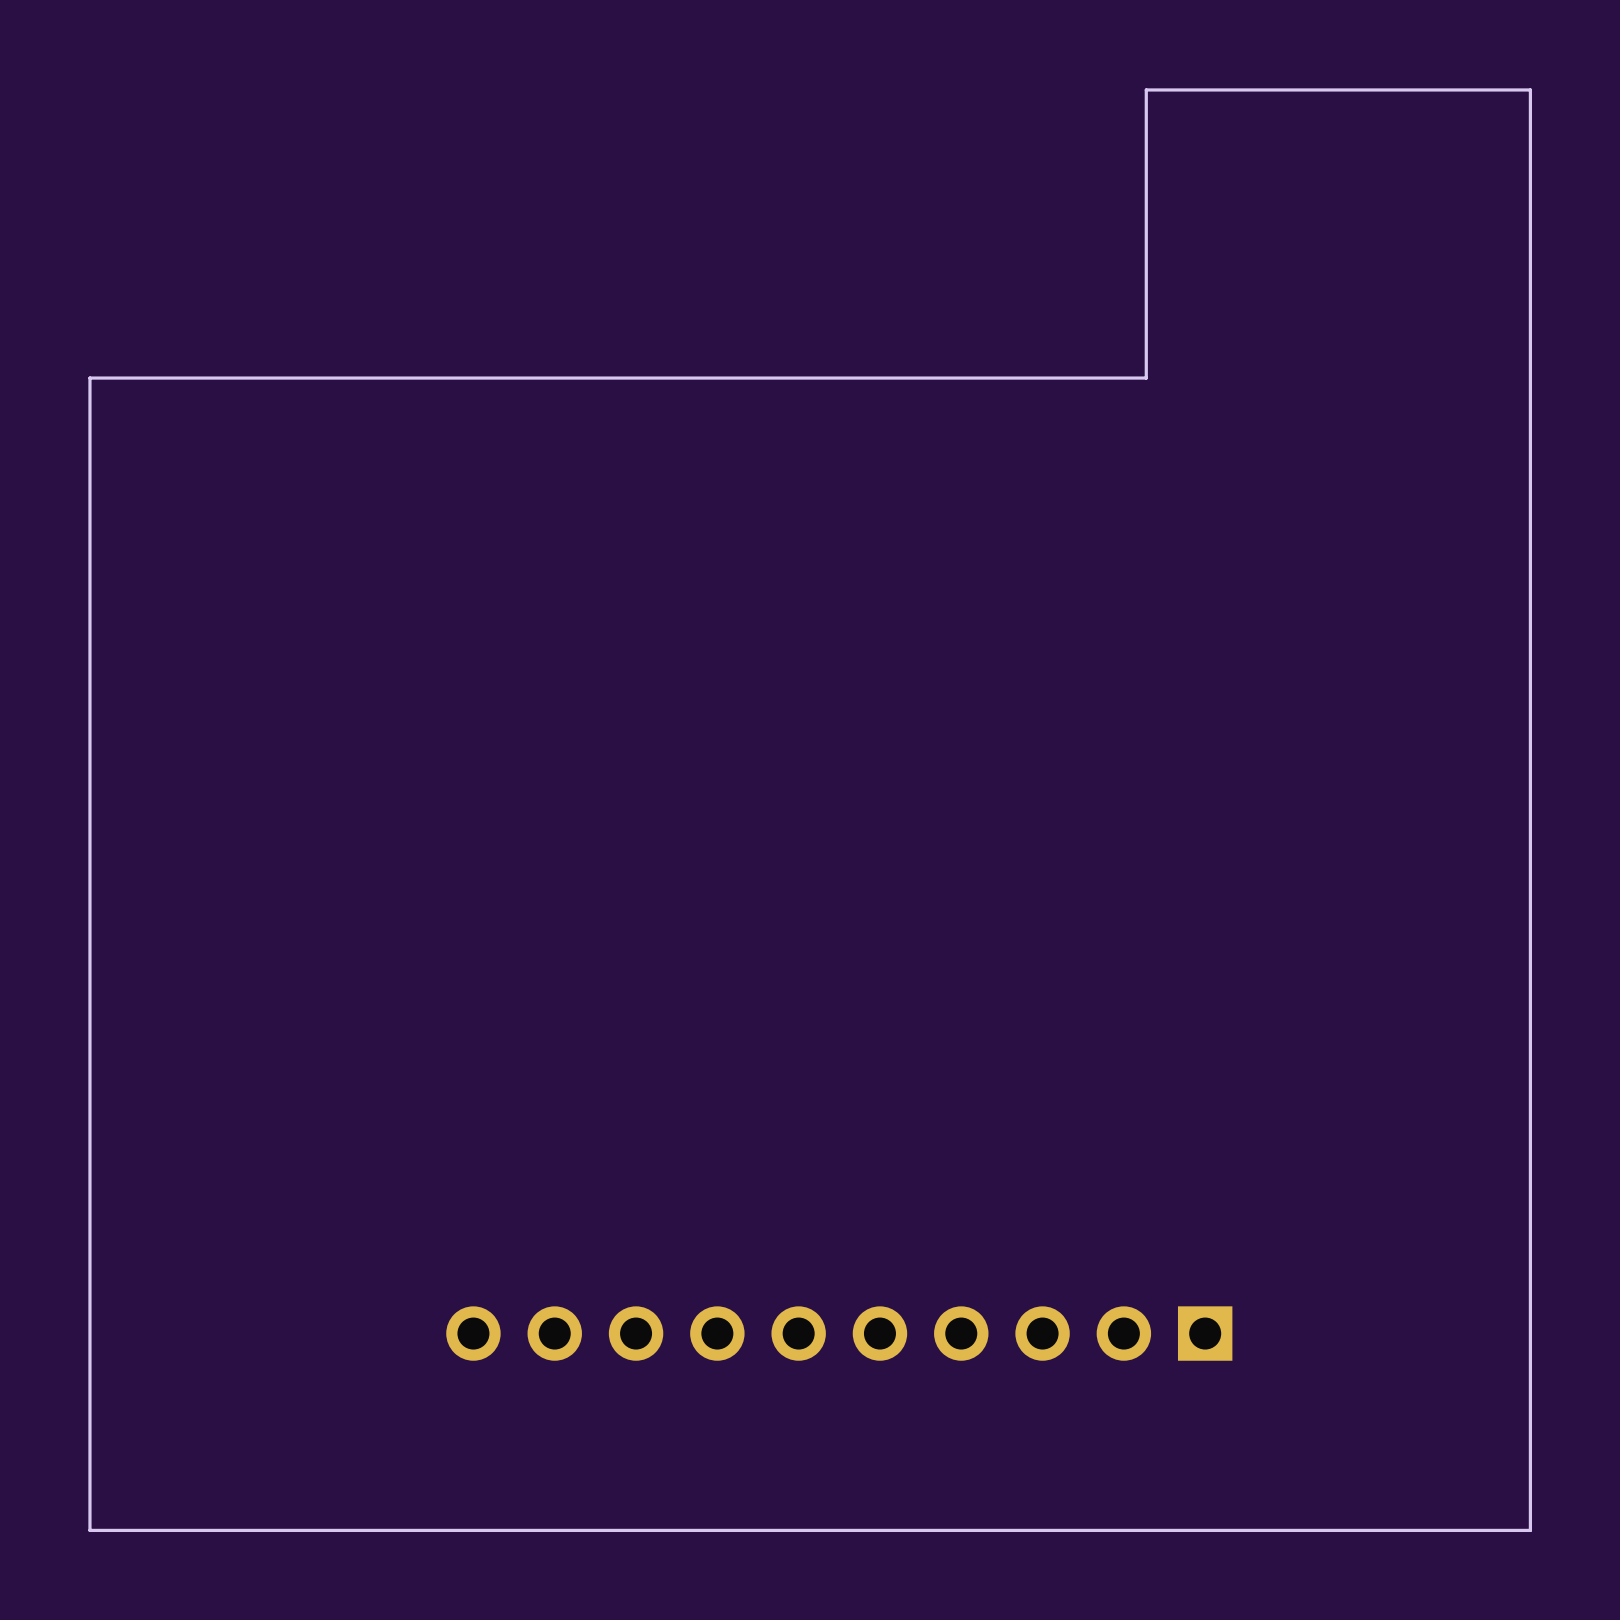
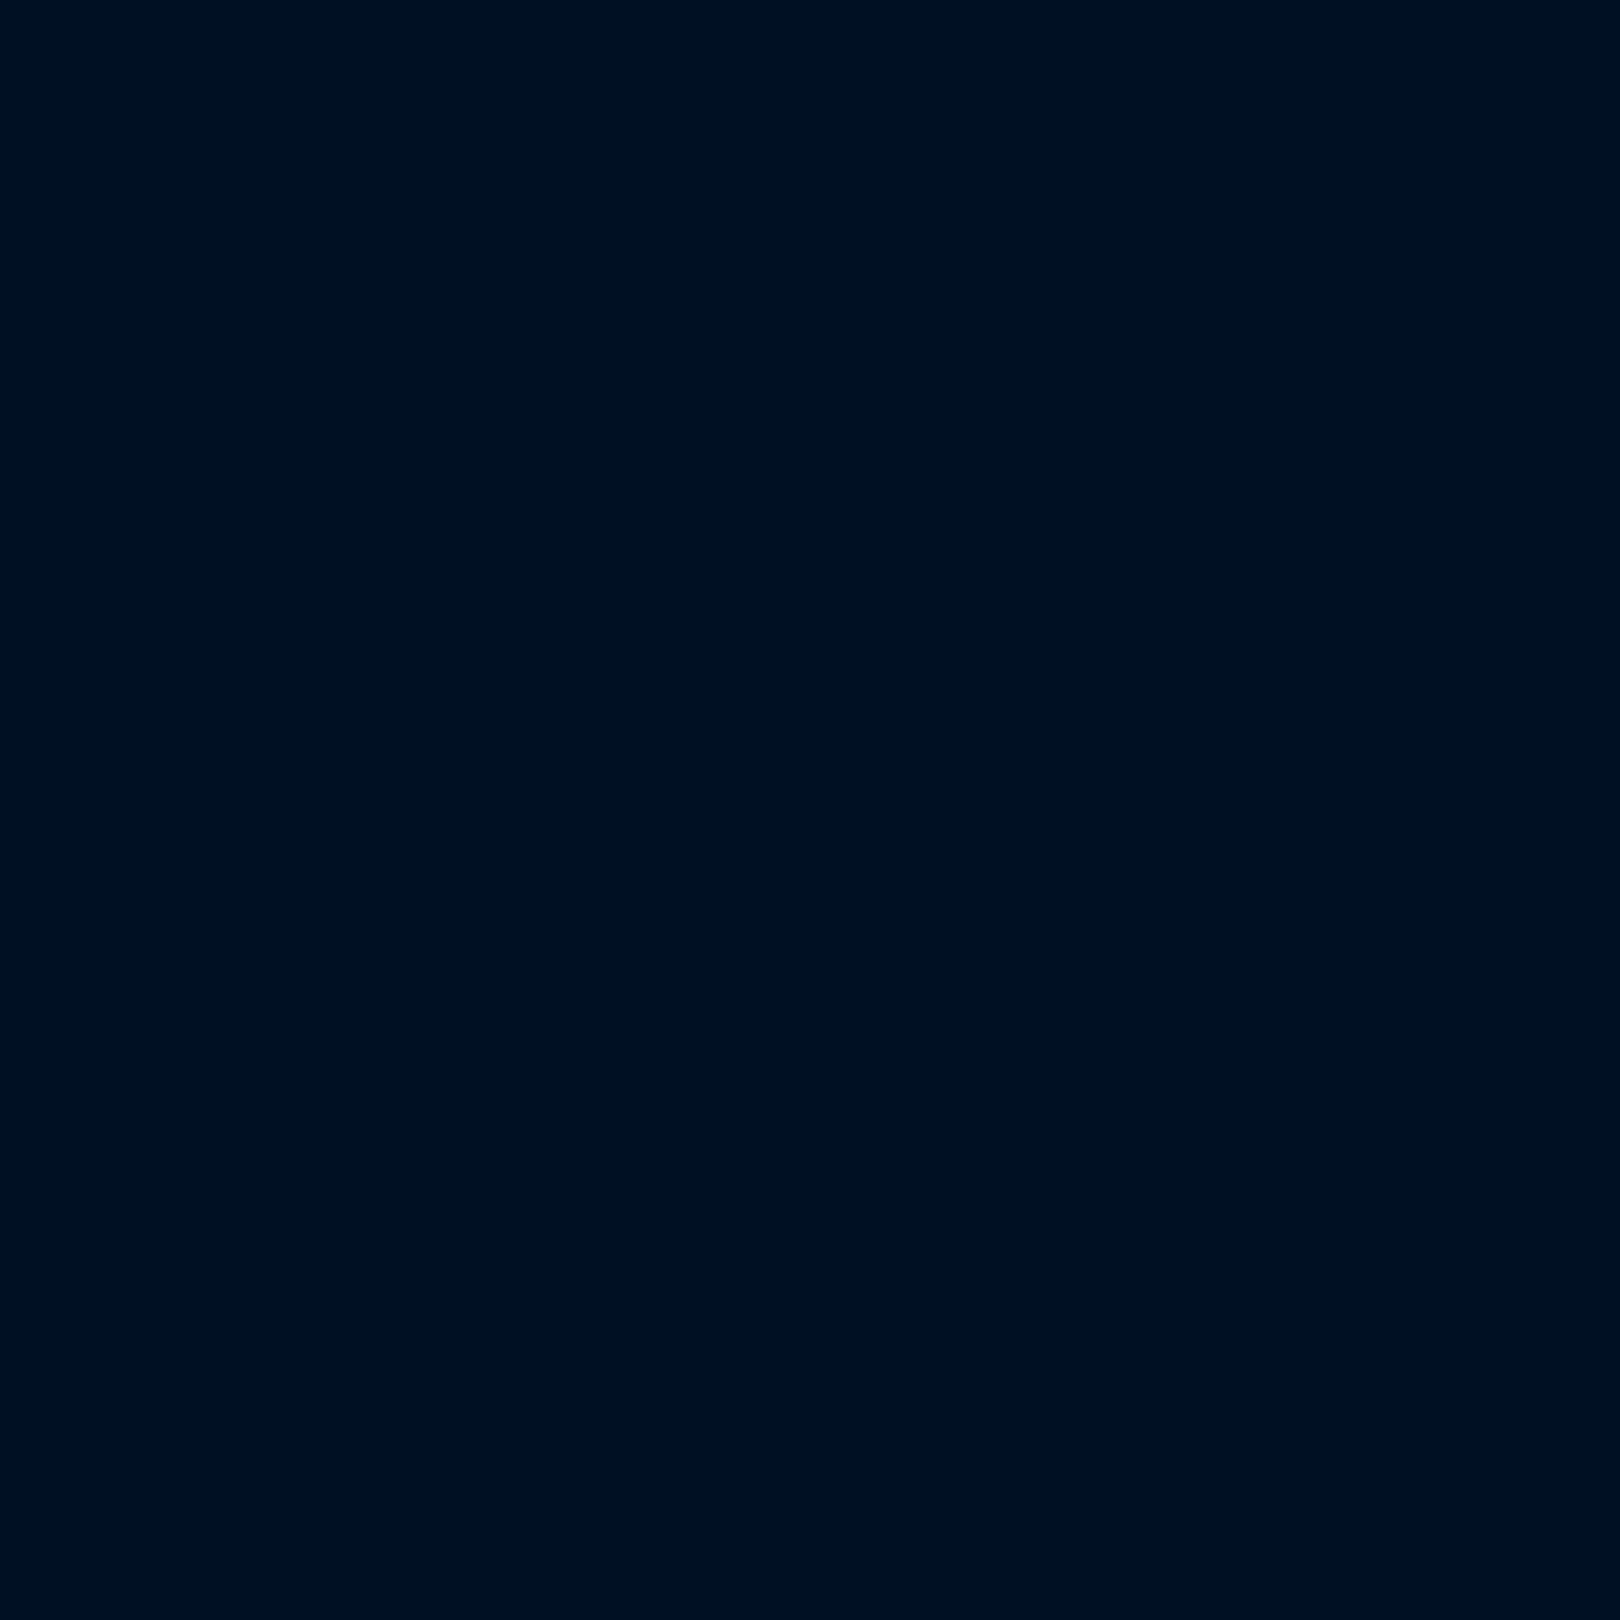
board edge: (1530, 89) (1146, 89) (1146, 378) (89, 378) (89, 1530) (1530, 1530) (1530, 89) -> none
part: (839, 1333) -> none

